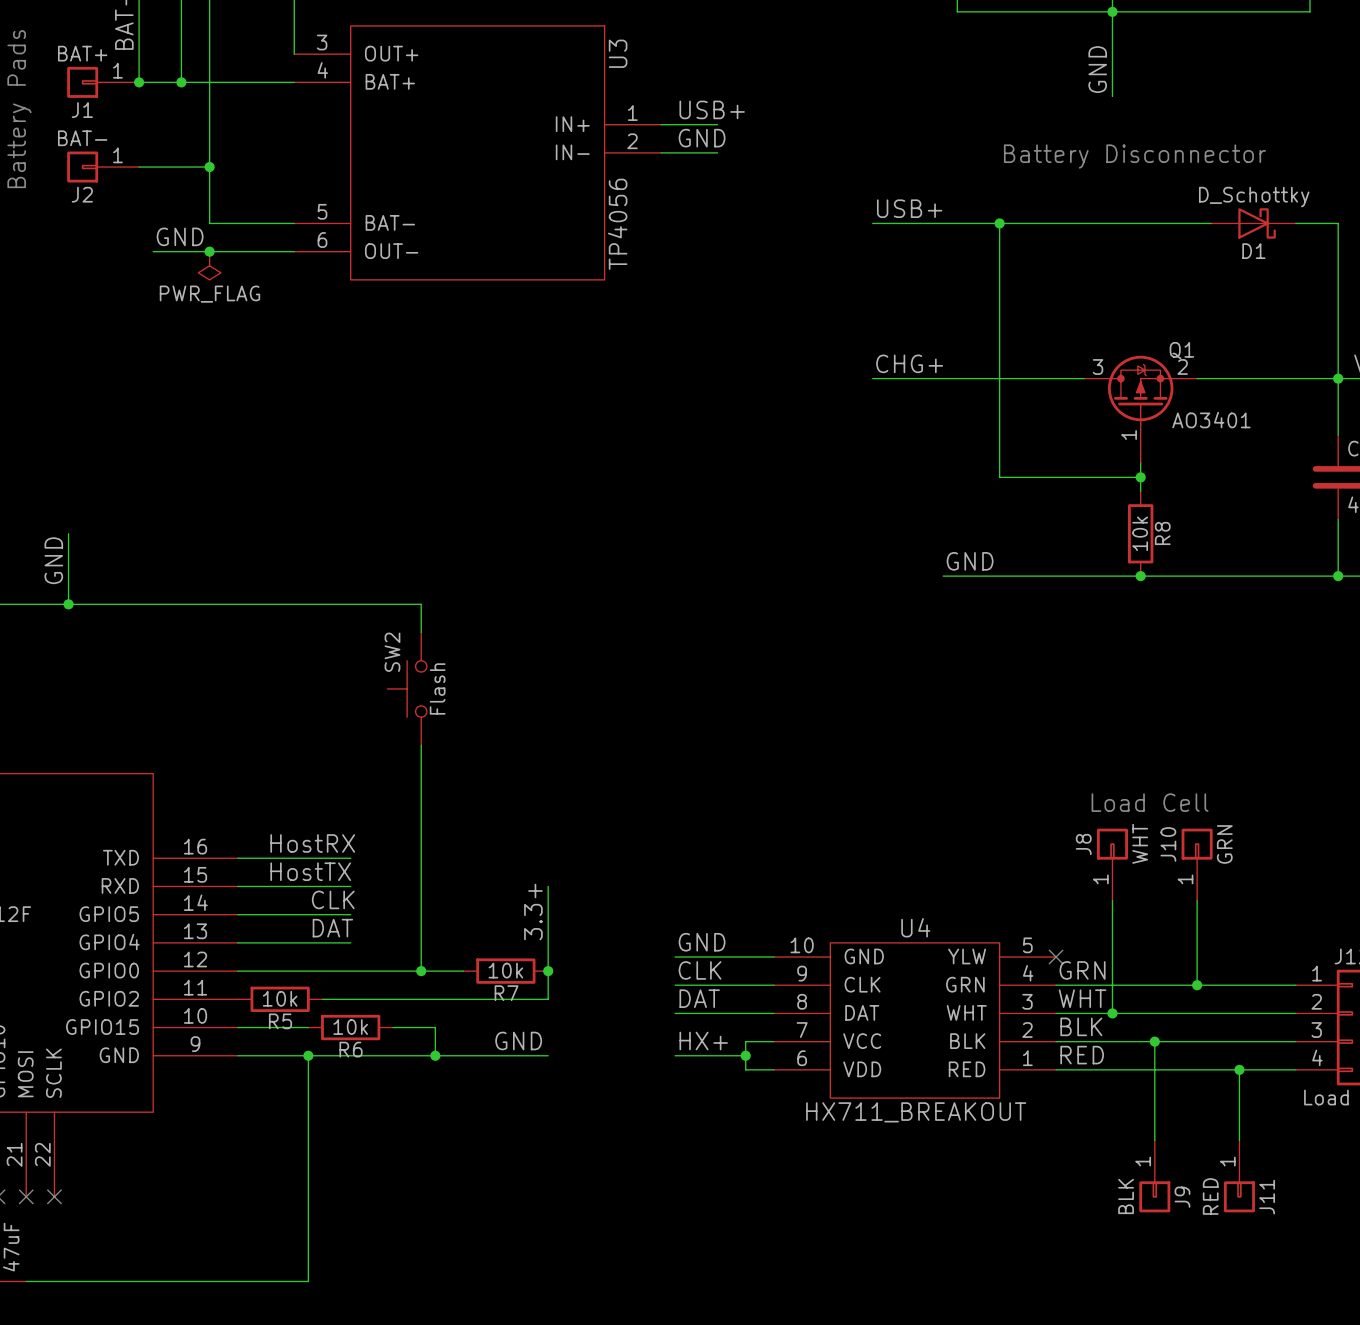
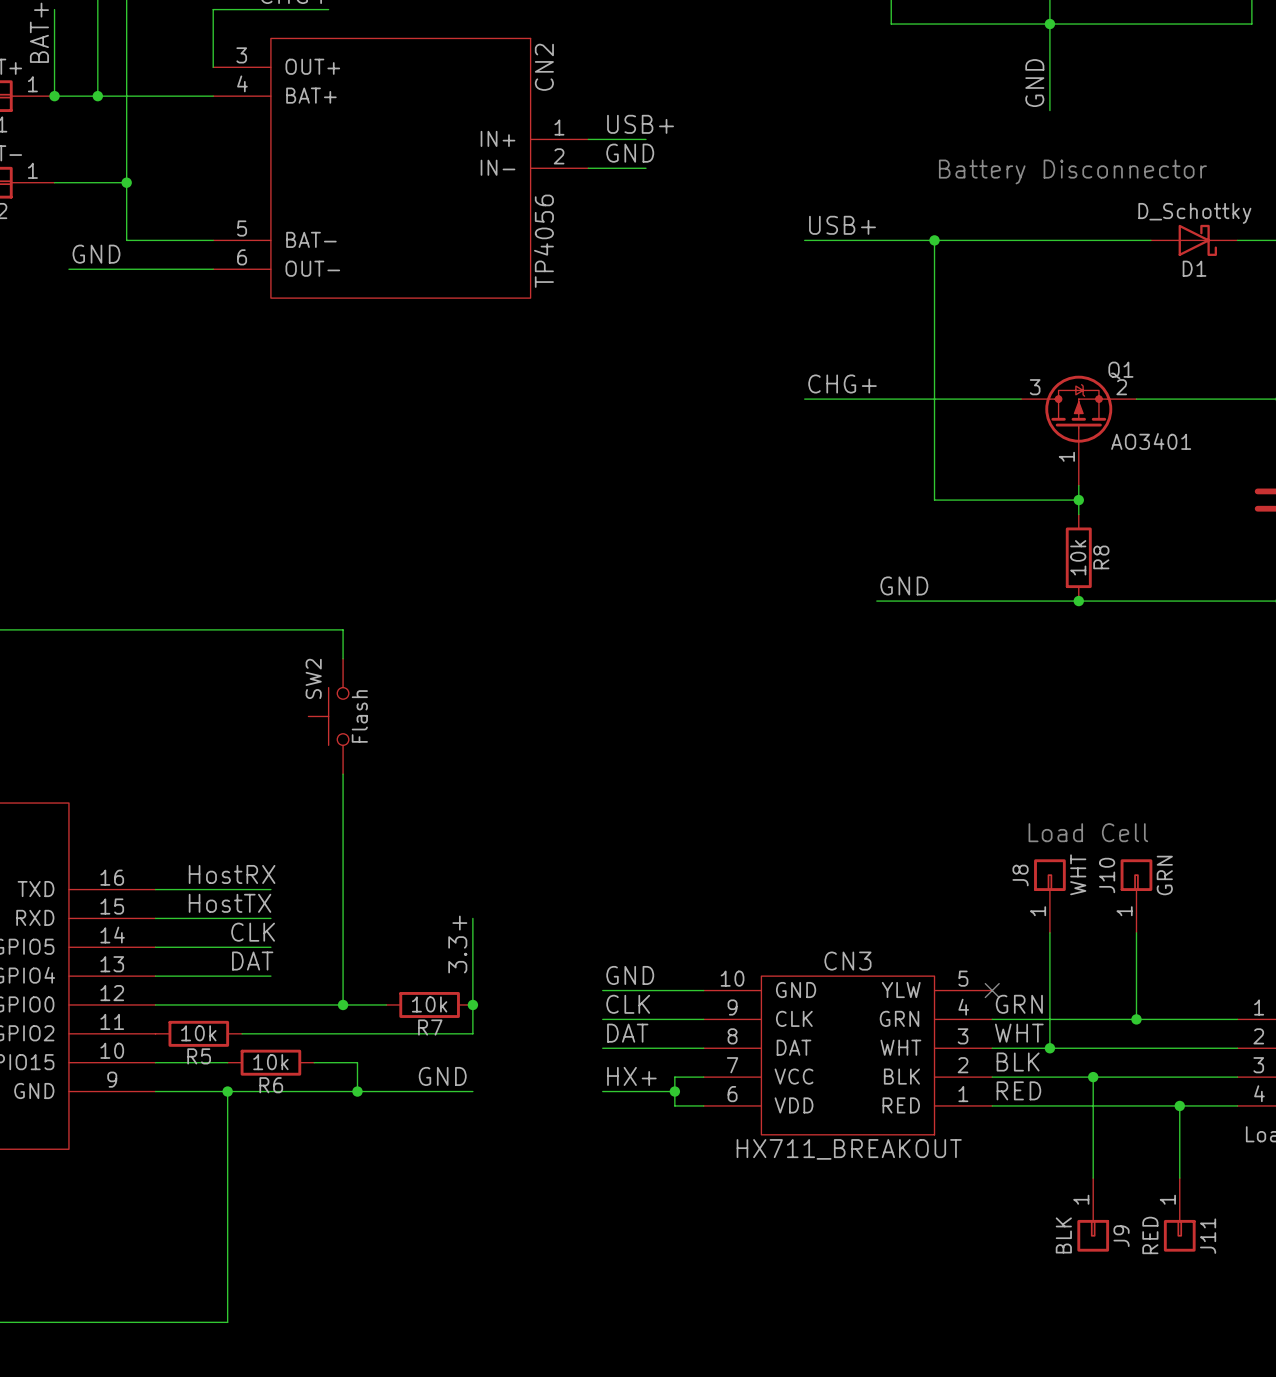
U3 name: U3 (618, 53) -> CN2 (544, 67)
junction: (209, 251) -> none
power symbol: PWR_FLAG (209, 265) -> none
U4 name: U4 (915, 927) -> CN3 (847, 961)

